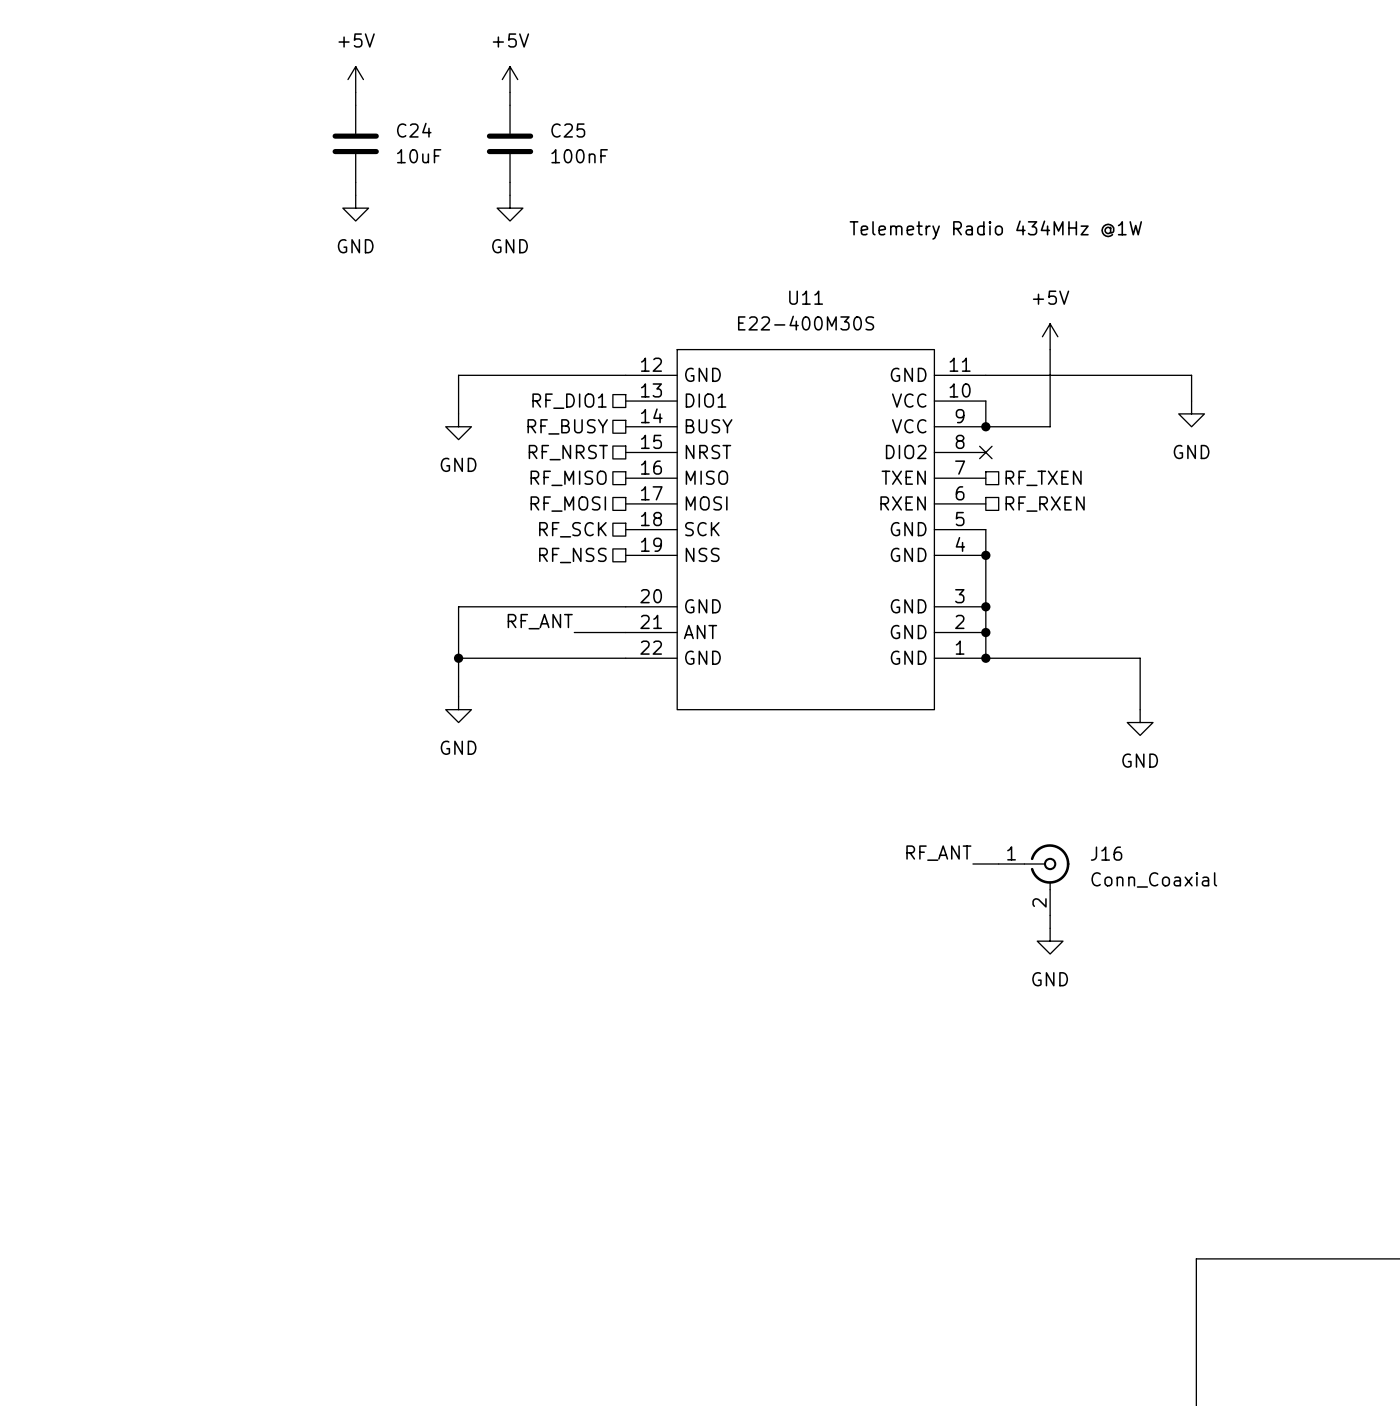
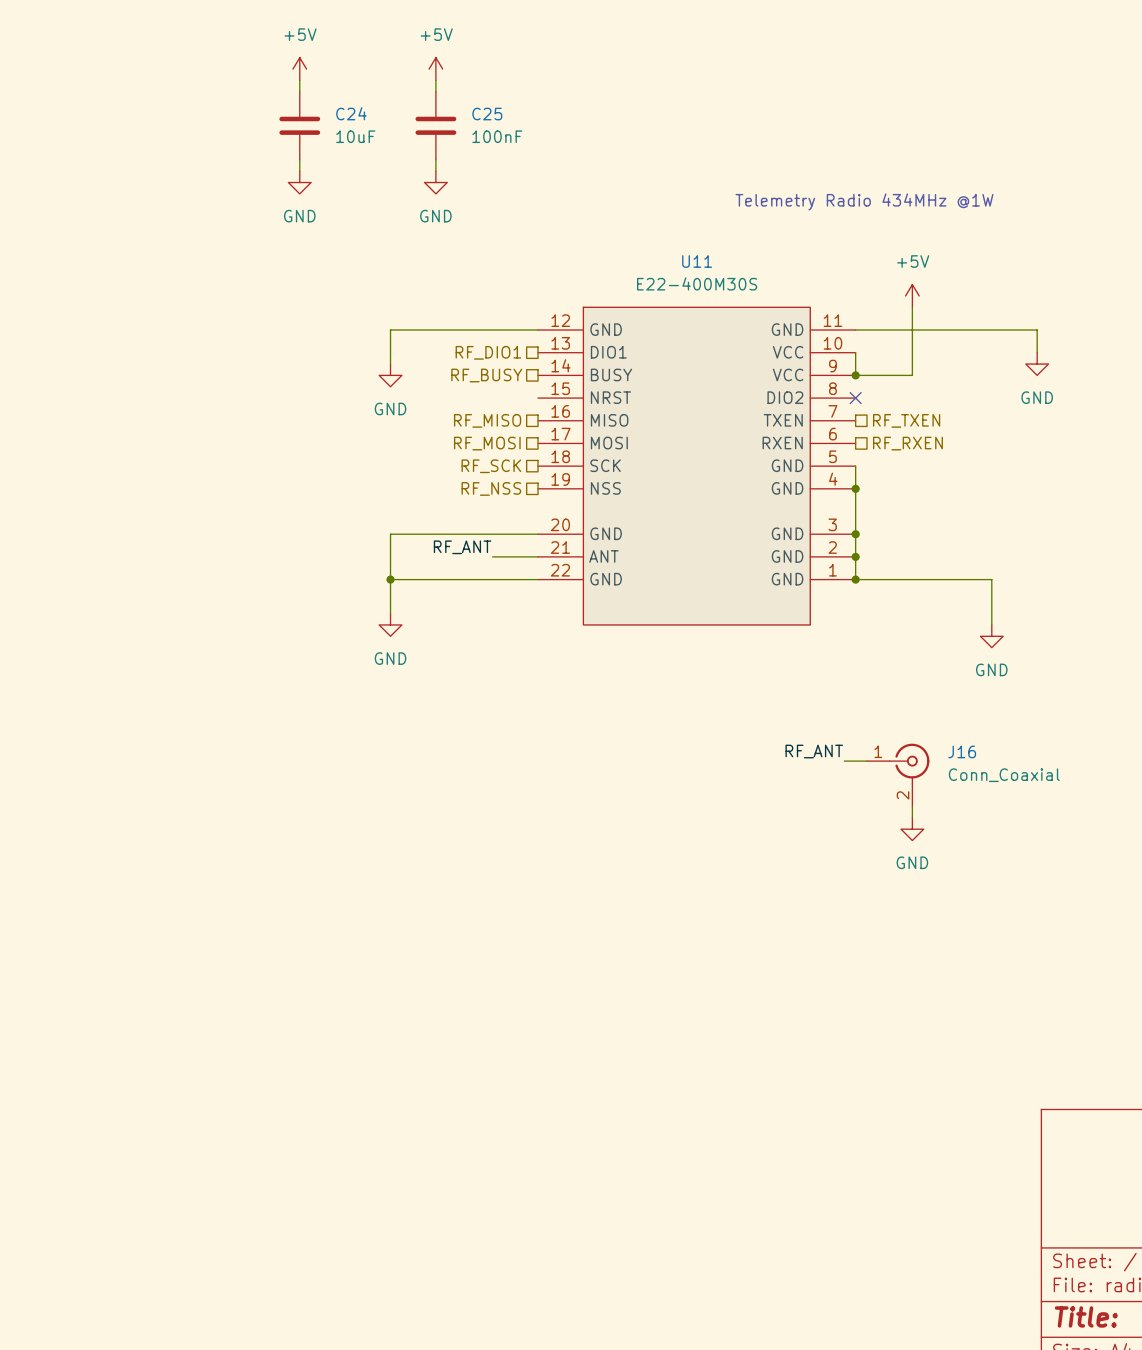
hierarchical label: RF_NRST (568, 452) -> none

